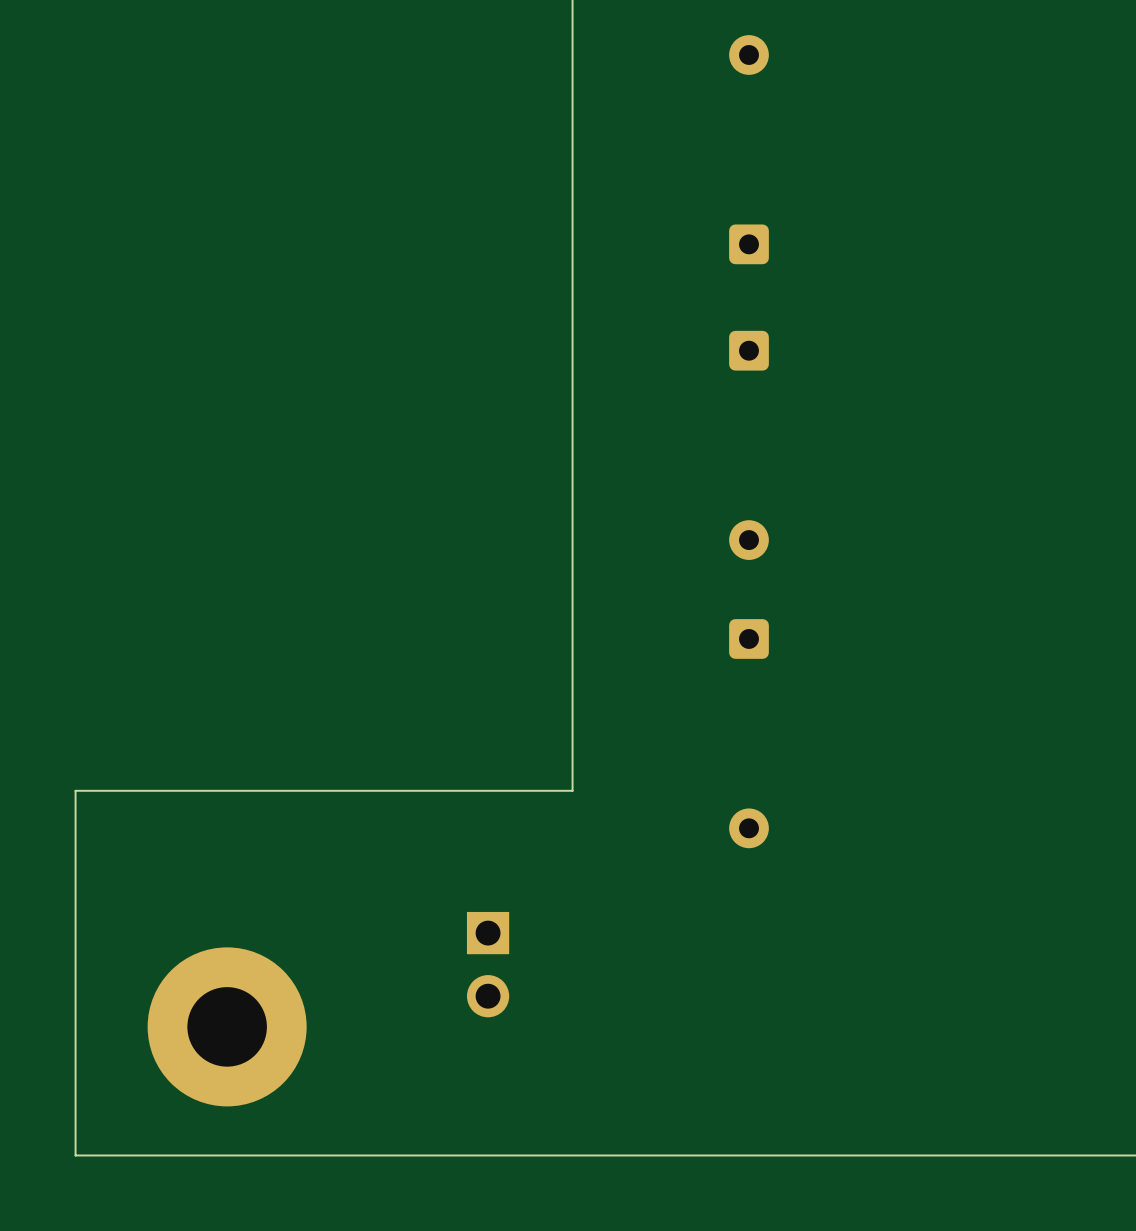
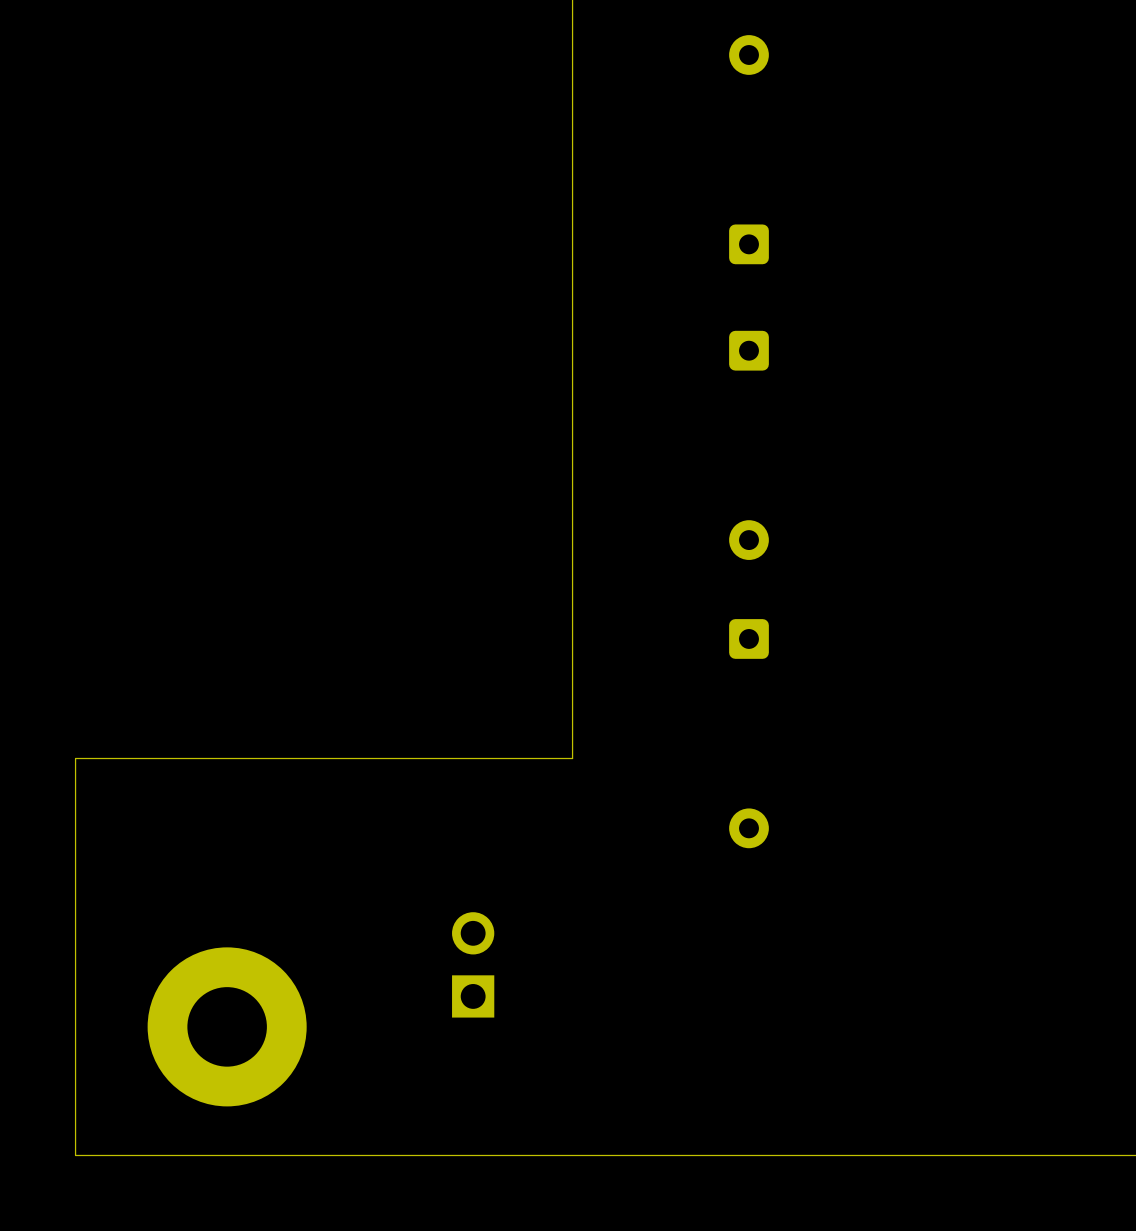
board edge: (572, 758) (572, 790) (75, 790) -> (572, 758) (75, 758) (75, 790)
part rotation: 0° (488, 964) -> 180° (473, 964)

